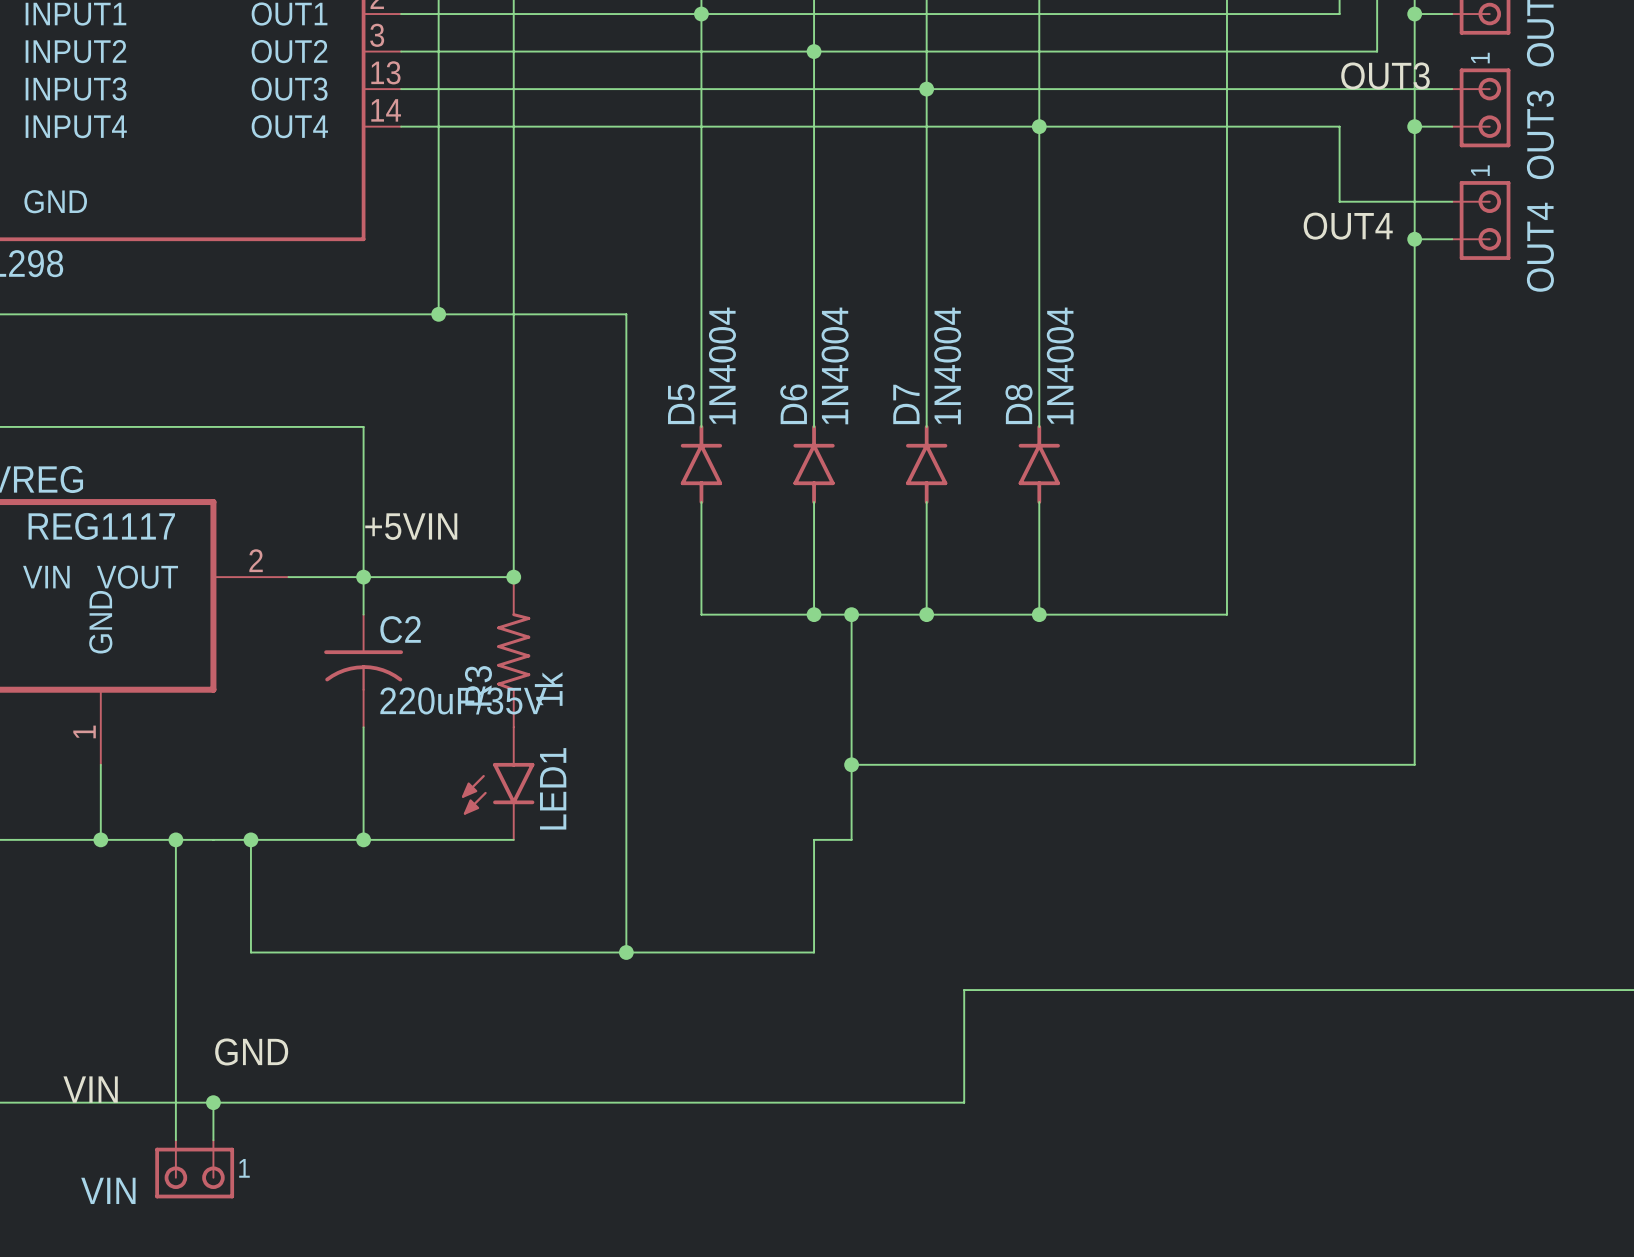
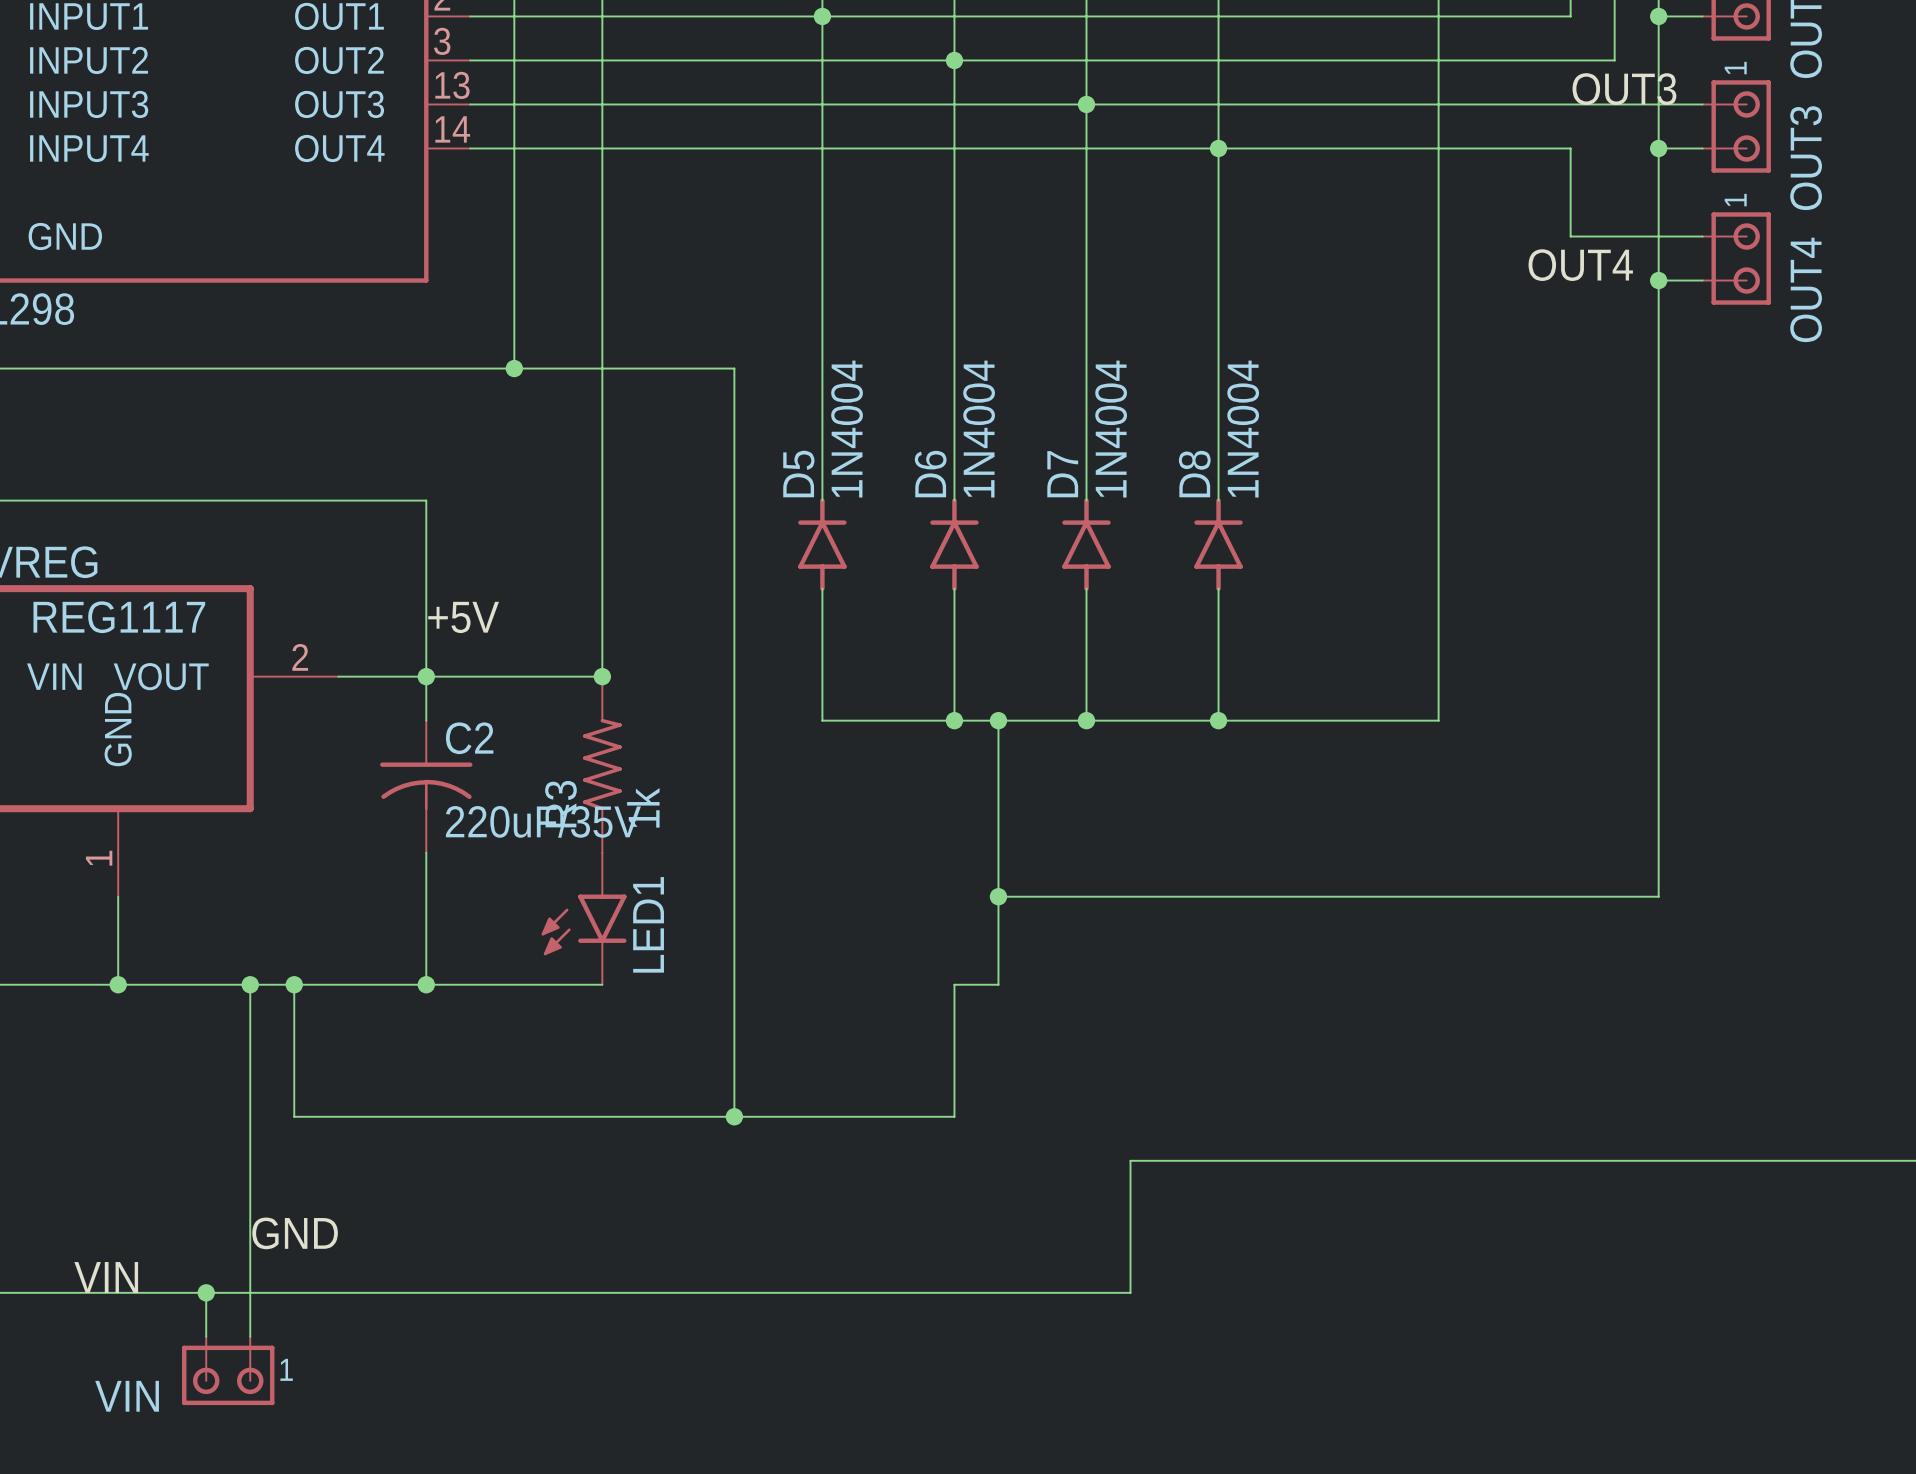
label: +5VIN (411, 526) -> +5V (463, 617)
wire: (175, 839) (175, 1102) -> (250, 984) (250, 1292)
junction position: (175, 839) -> (250, 984)
junction position: (213, 1102) -> (206, 1292)

